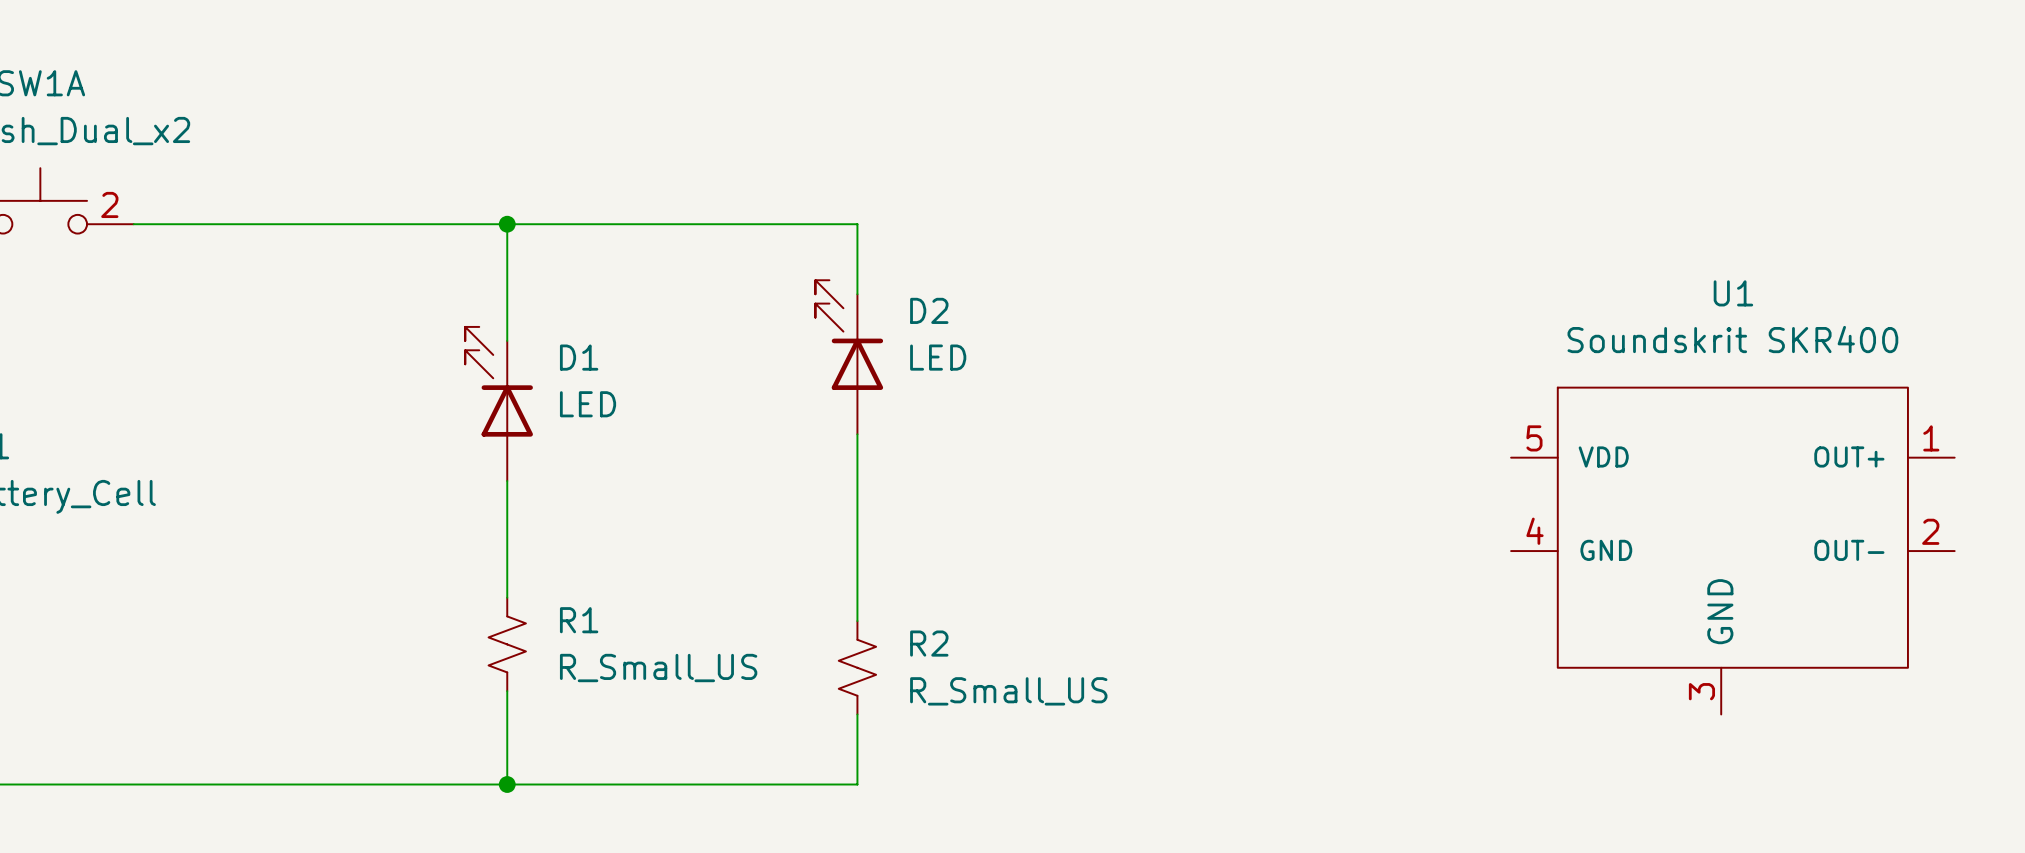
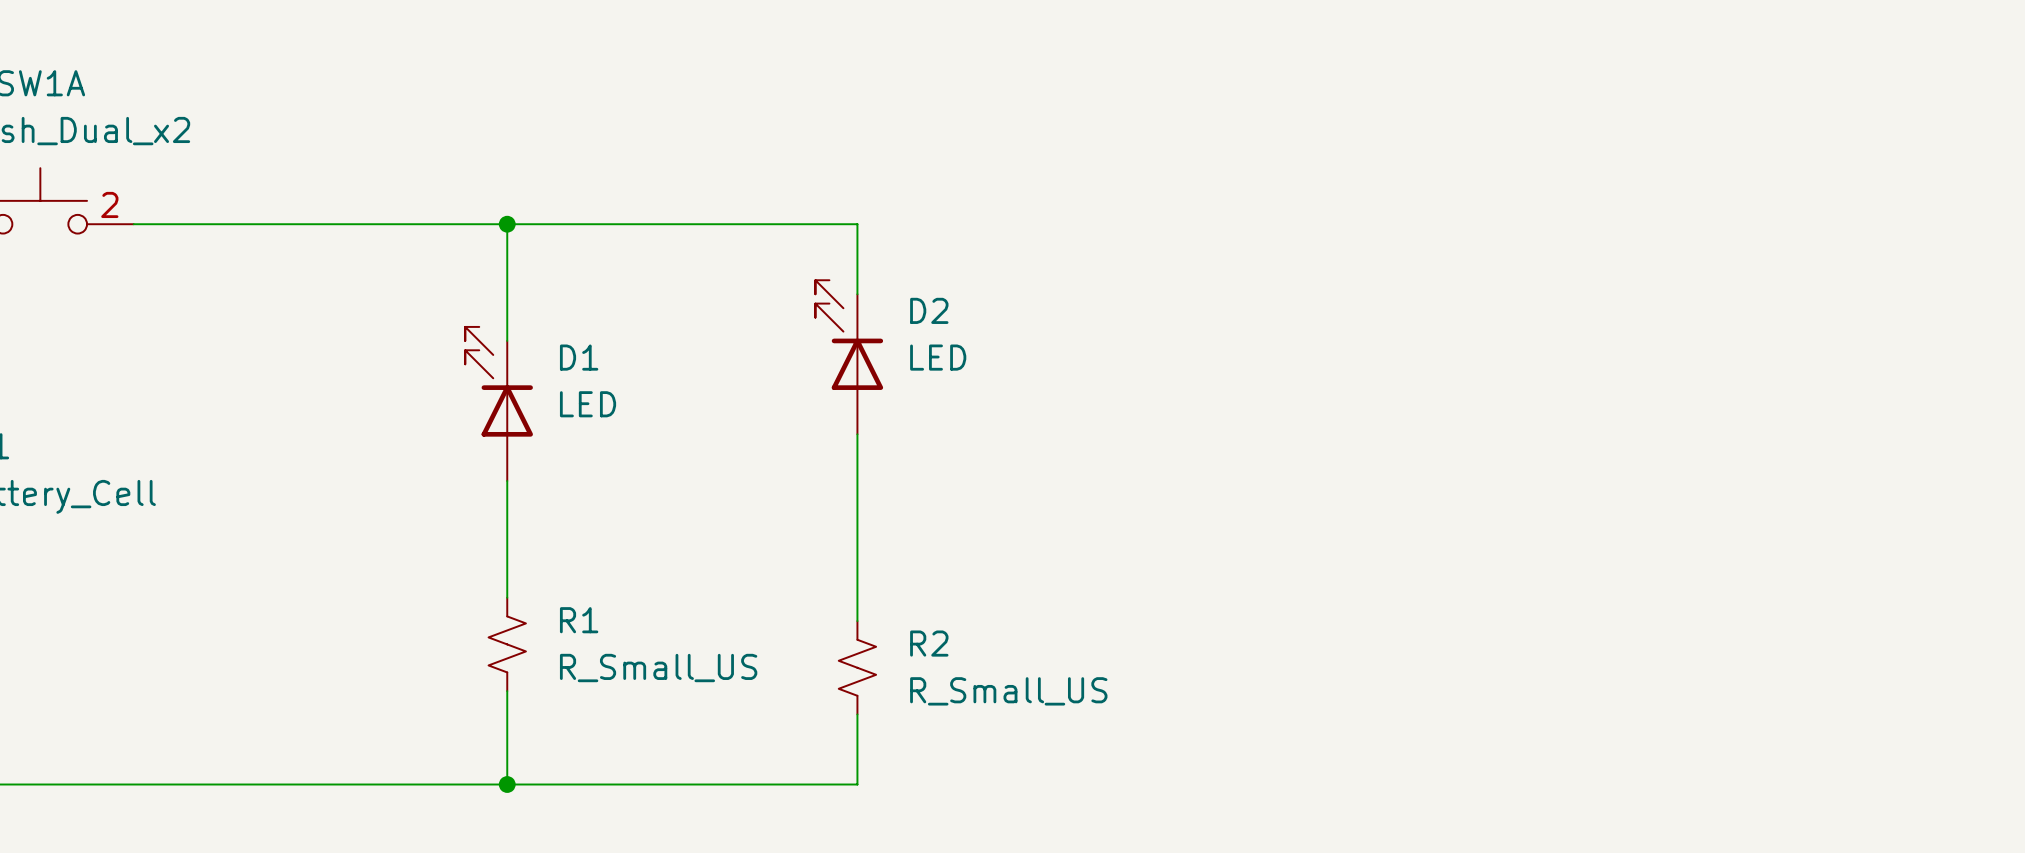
U1: Soundskrit SKR400 (1732, 551) -> none

